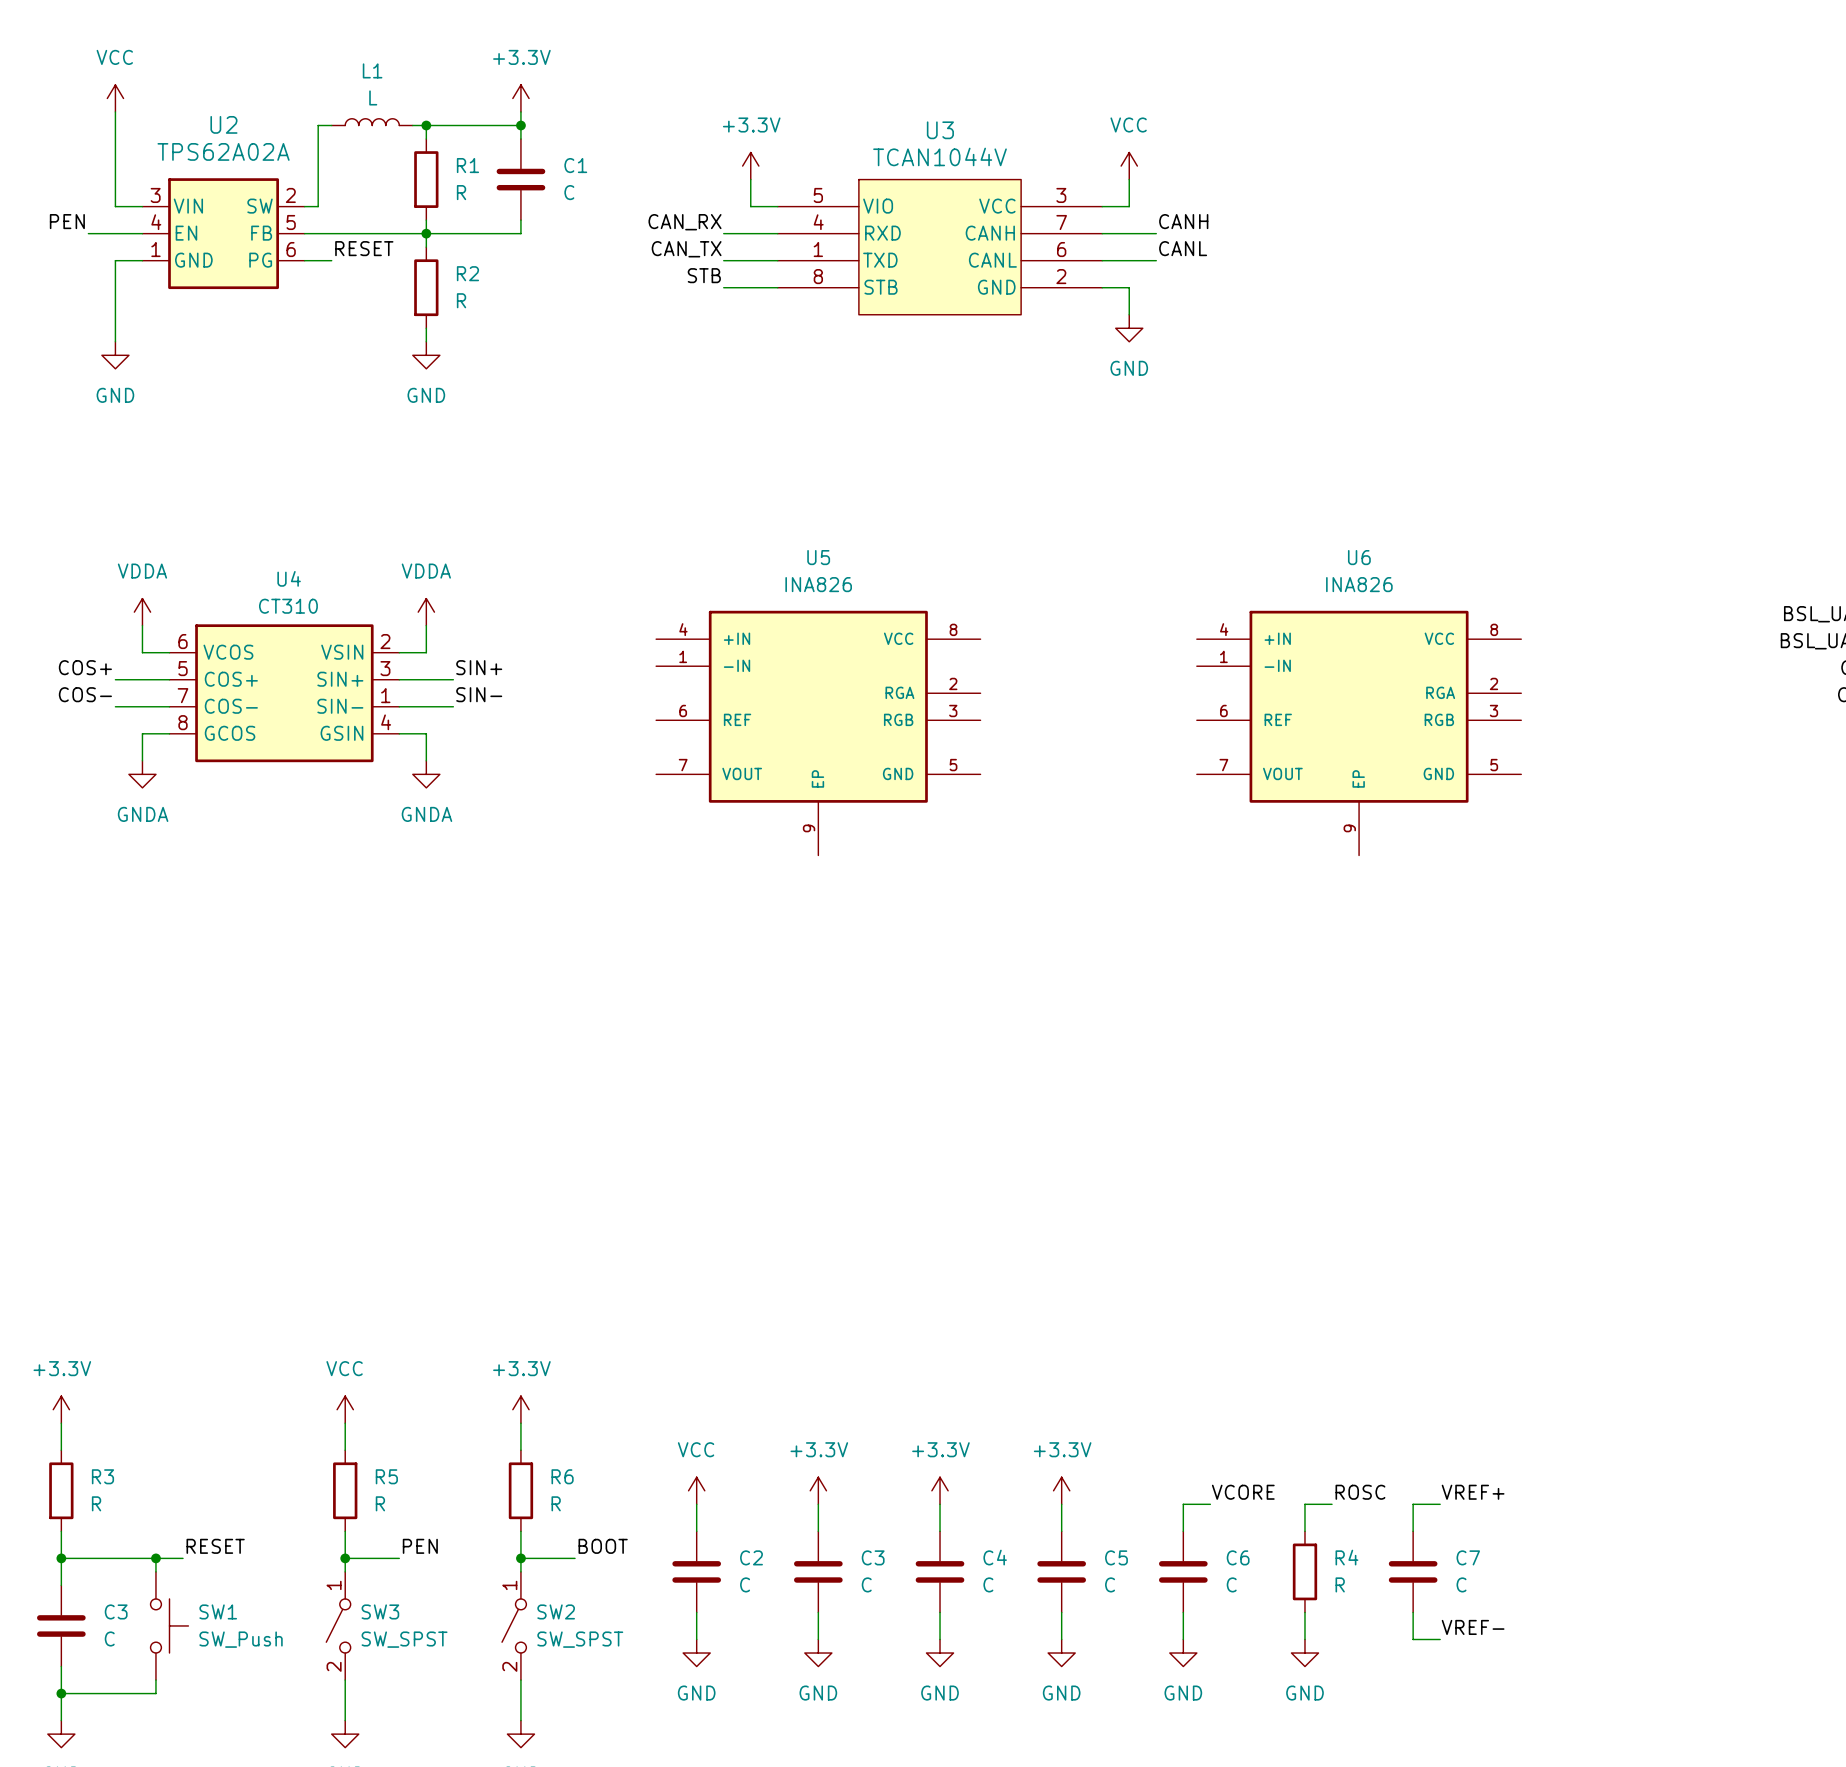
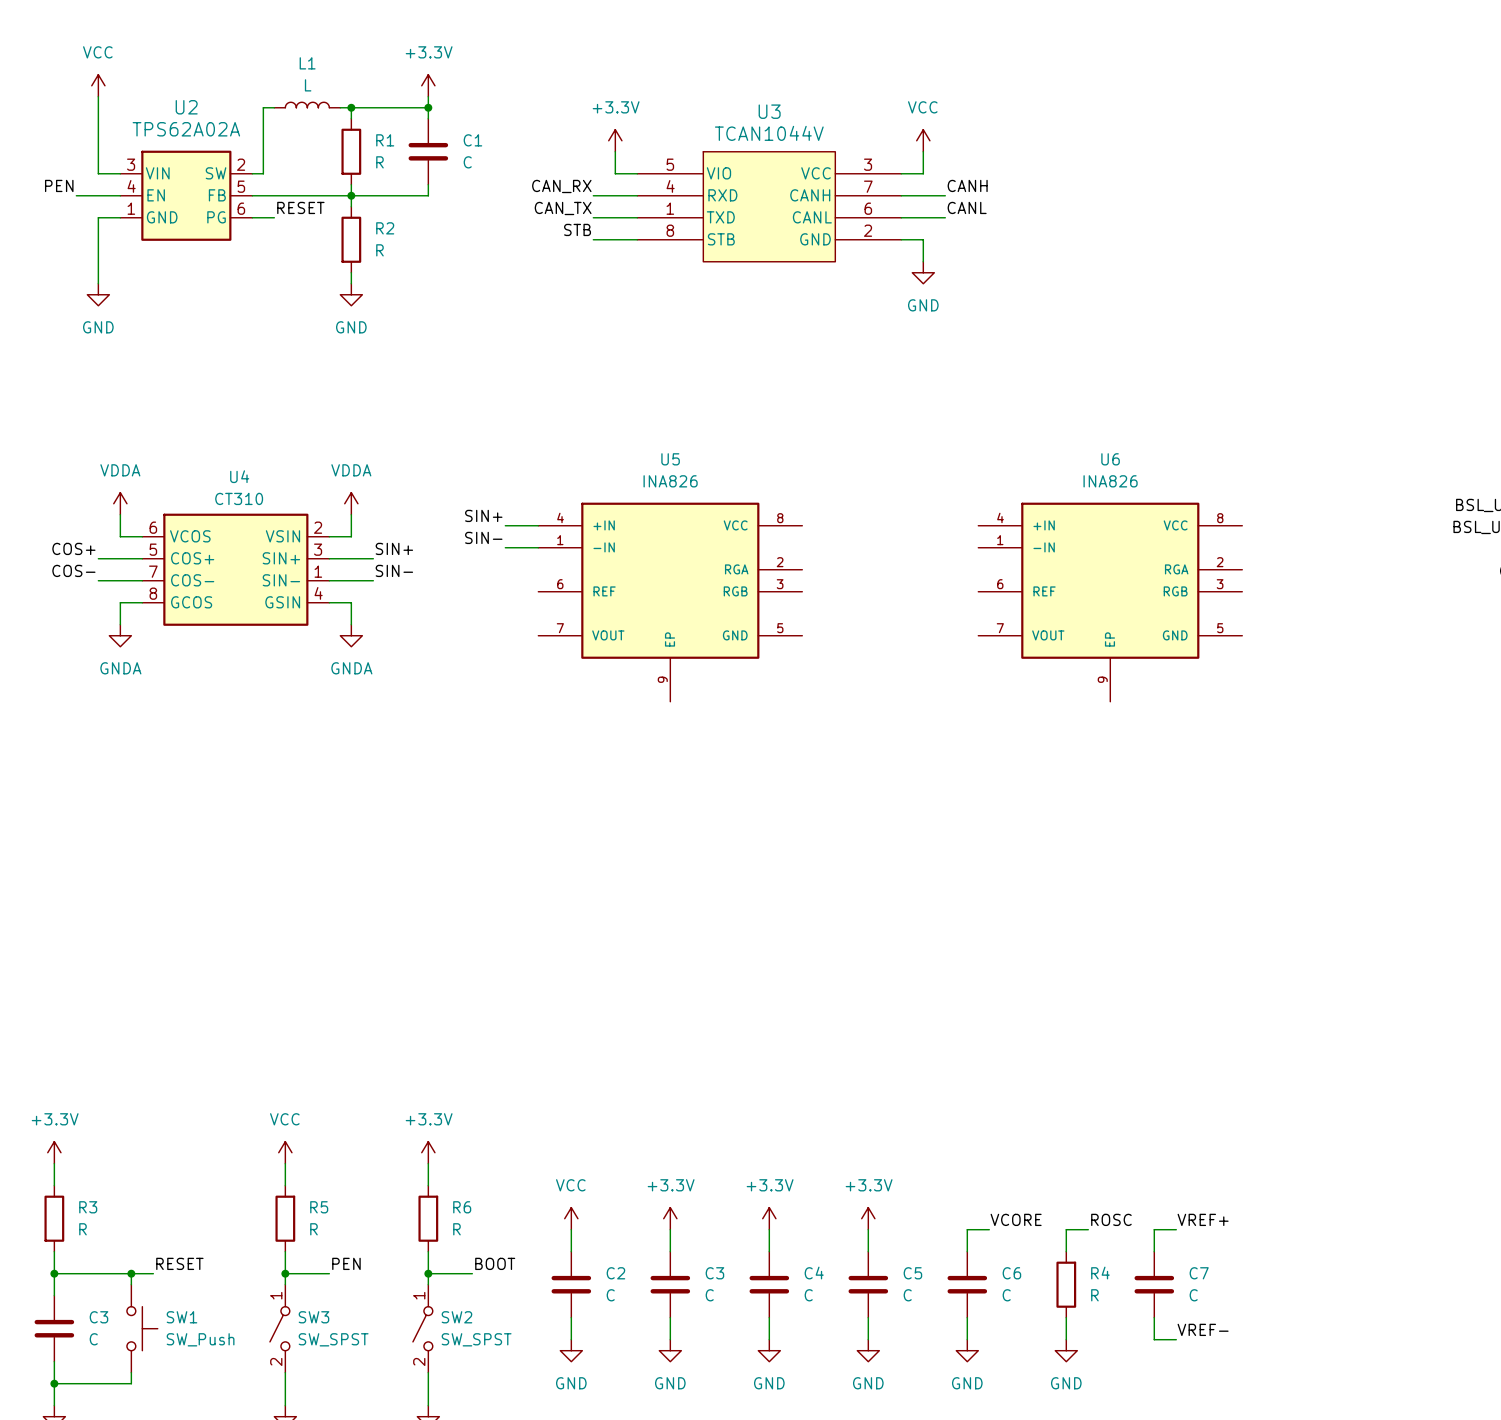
label: none -> SIN+ (483, 515)
wire: none -> (505, 525) (538, 525)
label: none -> SIN- (483, 537)
wire: none -> (505, 547) (538, 547)

